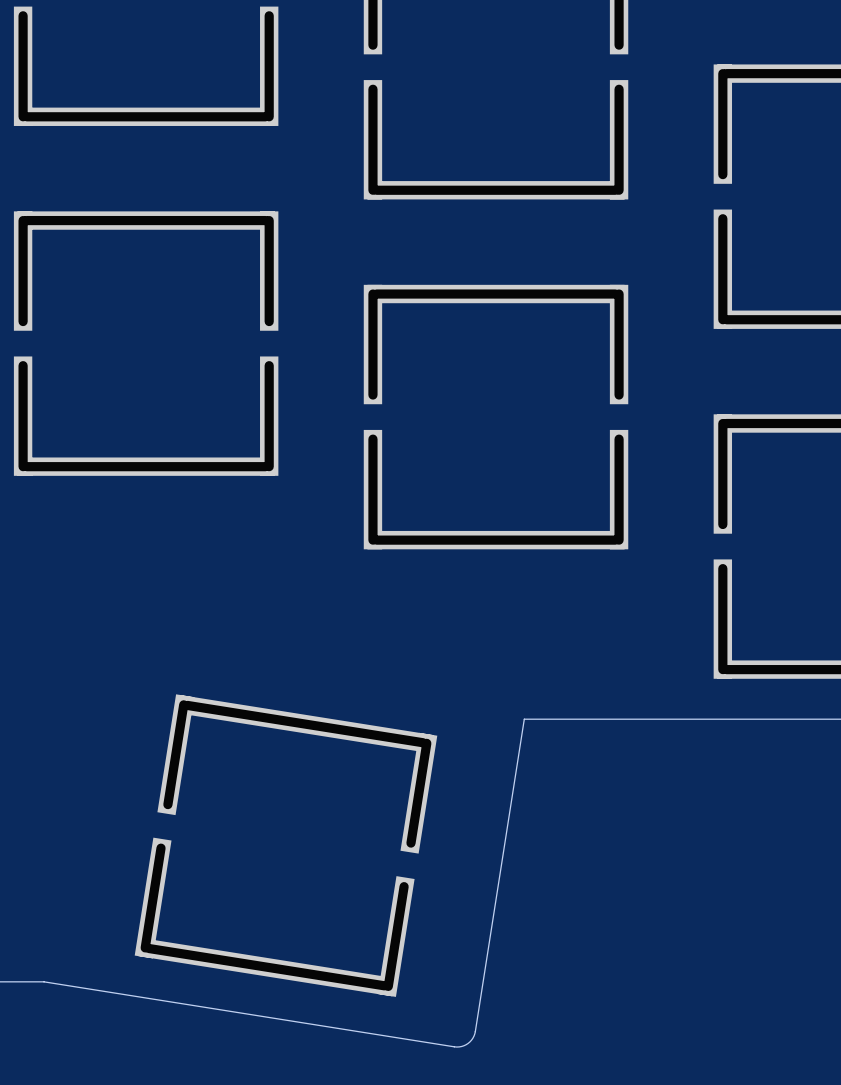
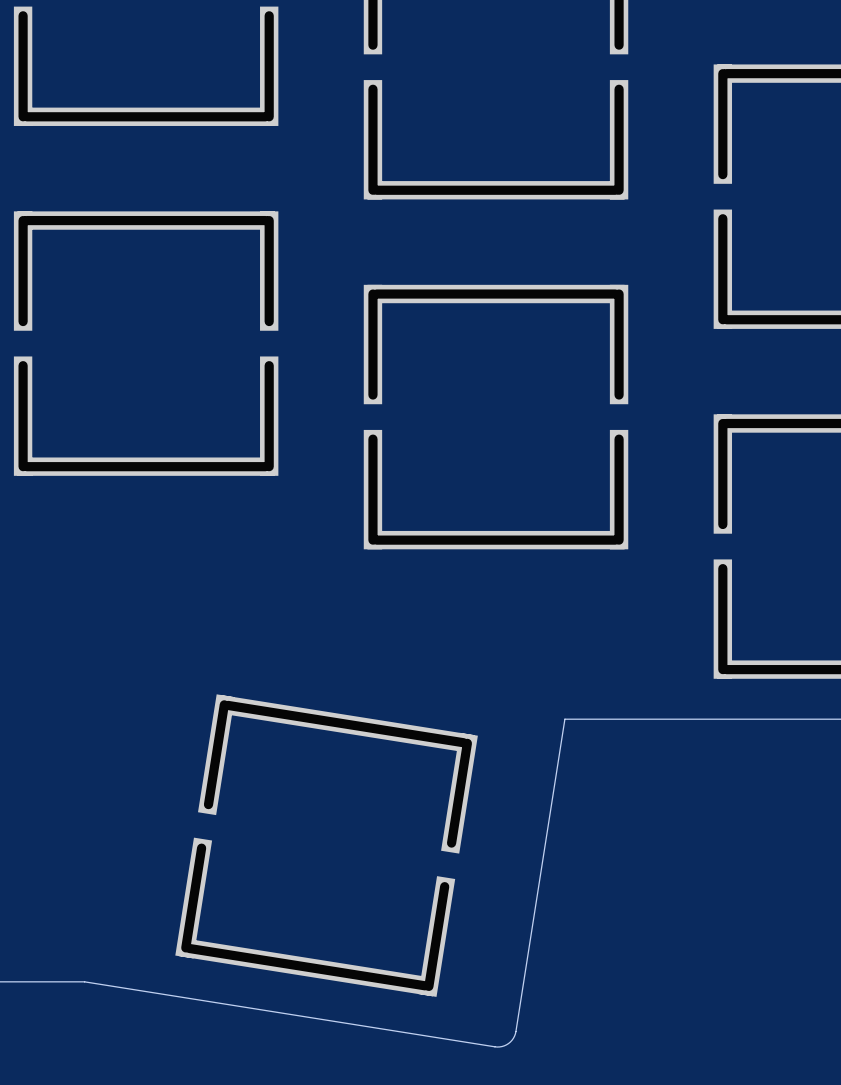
board edge: (564, 719) (524, 719) (475, 1031) (472, 1038) (465, 1044) (454, 1046) (44, 981) -> (564, 719) (515, 1031) (513, 1038) (506, 1044) (494, 1046) (84, 981) (44, 981)
part position: (286, 845) -> (326, 845)

